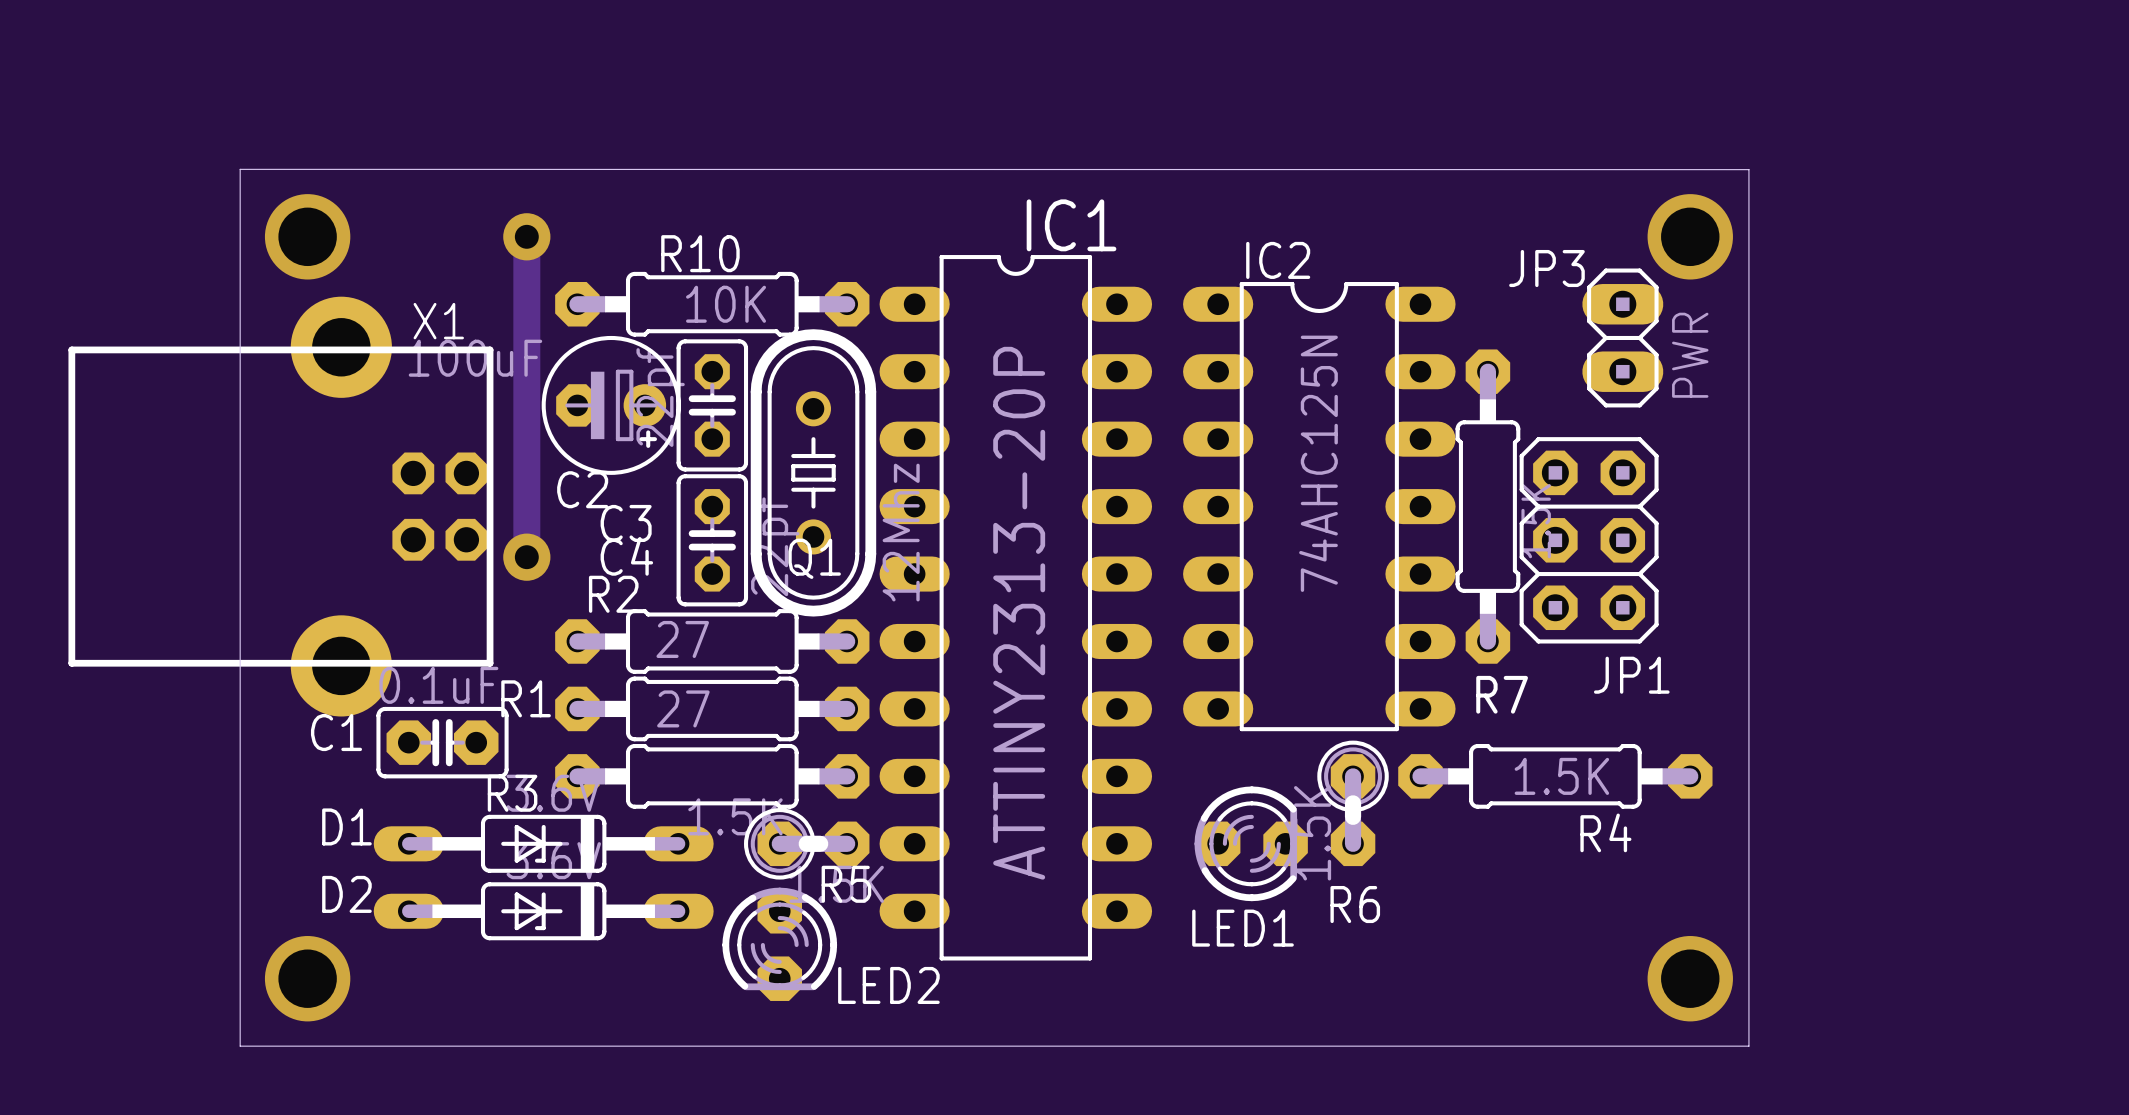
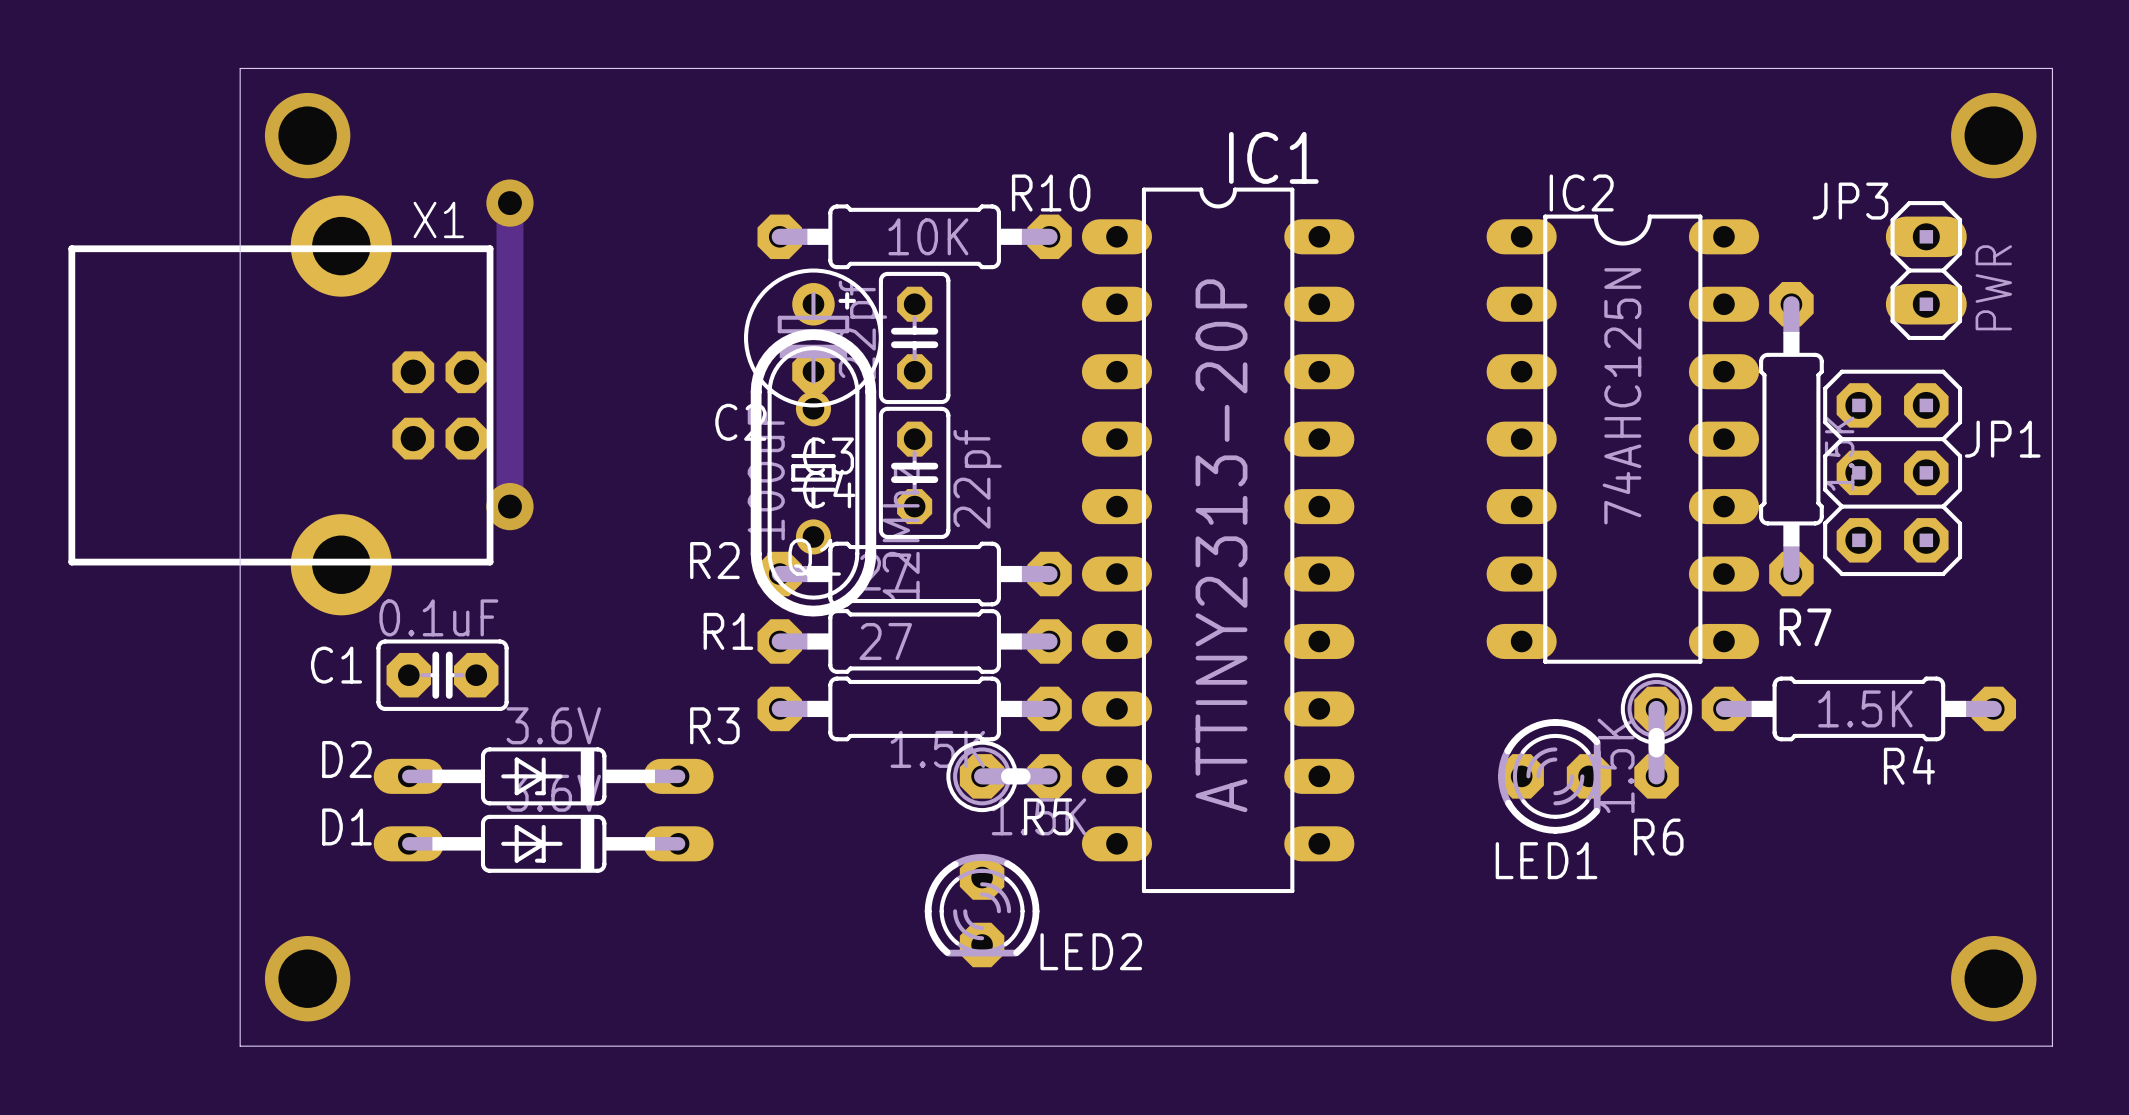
via: none -> (1993, 135)
board edge: (240, 169) (1748, 169) (1748, 1046) -> (240, 169) (240, 68) (2052, 68) (2052, 1046) (1748, 1046)
track: none -> (509, 203) (509, 506)
via position: (307, 236) -> (307, 135)
track: (526, 236) (526, 557) -> none
via position: (526, 236) -> (509, 203)
via: (1690, 236) -> none
R10 name position: R10 (700, 253) -> R10 (1051, 192)
R10 position: (712, 304) -> (914, 236)
JP3 position: (1622, 337) -> (1926, 270)
C2 rotation: 0° (611, 405) -> 90° counterclockwise (813, 337)
C2 position: (611, 405) -> (813, 337)
C3 position: (712, 405) -> (914, 337)
X1 position: (280, 506) -> (280, 405)
IC2 position: (1319, 506) -> (1622, 439)
R7 position: (1487, 506) -> (1791, 439)
C4 position: (712, 540) -> (914, 472)
JP1 position: (1589, 540) -> (1892, 472)
via position: (526, 557) -> (509, 506)
R2 name position: R2 (613, 594) -> R2 (714, 560)
IC1 position: (1015, 607) -> (1218, 540)
R2 position: (712, 641) -> (914, 574)
JP1 name position: JP1 (1631, 675) -> JP1 (2002, 439)
R1 position: (712, 708) -> (914, 641)
C1 position: (442, 742) -> (442, 675)
R3 position: (712, 776) -> (914, 708)
R4 position: (1555, 776) -> (1858, 708)
R6 position: (1353, 803) -> (1656, 735)
R5 position: (806, 843) -> (1009, 776)
LED1 position: (1251, 843) -> (1554, 776)
D2 position: (543, 911) -> (543, 776)
LED2 position: (779, 944) -> (982, 910)
via: (1690, 978) -> none
via: none -> (1993, 978)

